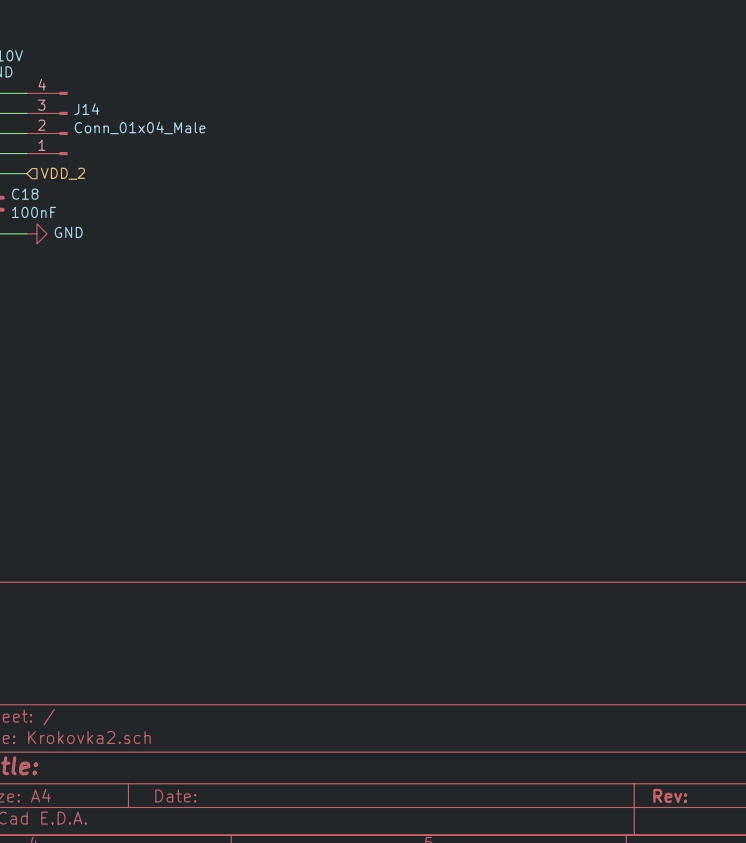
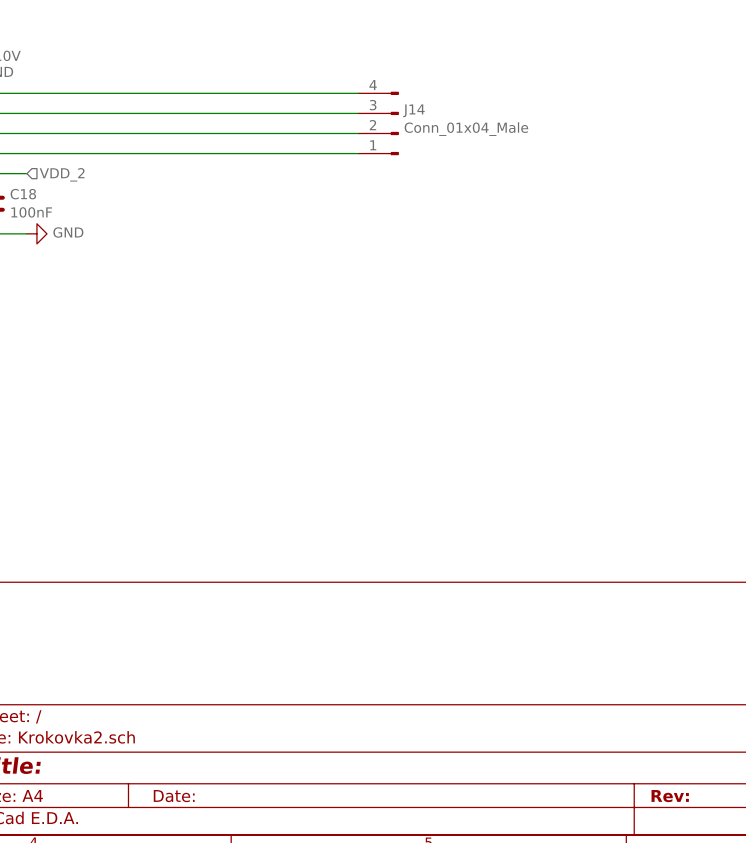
wire: none -> (26, 93) (358, 93)
wire: none -> (26, 113) (358, 113)
J14 position: (47, 123) -> (378, 123)
wire: none -> (26, 133) (358, 133)
wire: none -> (26, 153) (358, 153)

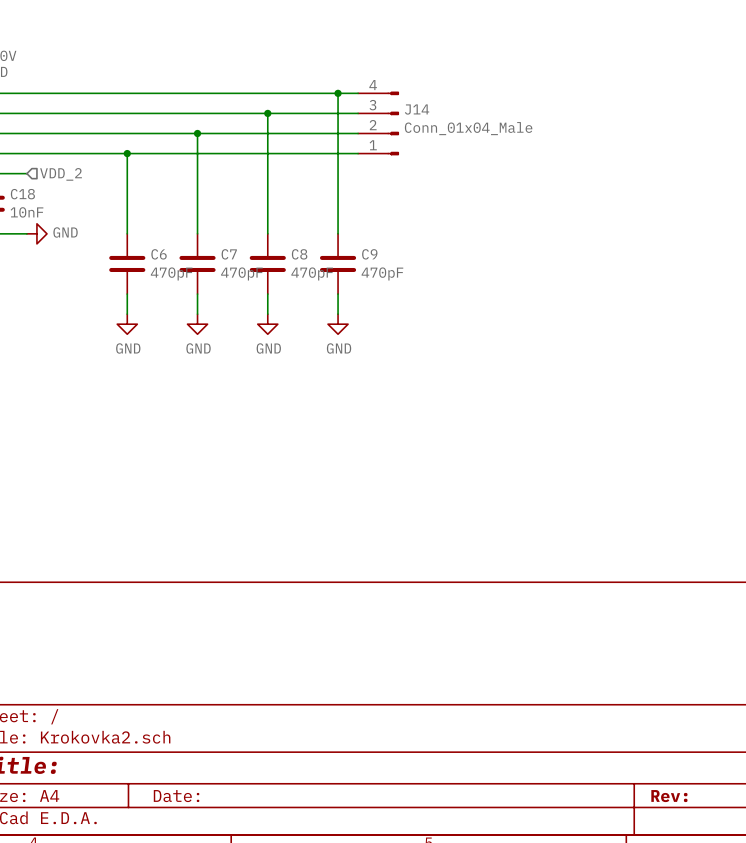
wire: none -> (338, 93) (338, 233)
junction: none -> (338, 93)
wire: none -> (267, 113) (267, 233)
junction: none -> (267, 113)
wire: none -> (197, 133) (197, 233)
junction: none -> (197, 133)
wire: none -> (127, 153) (127, 233)
junction: none -> (127, 153)
C18 value: 100nF (31, 212) -> 10nF (26, 212)
C6: none -> 470pF (127, 263)
C7: none -> 470pF (197, 263)
C8: none -> 470pF (267, 263)
C9: none -> 470pF (338, 263)
wire: none -> (127, 294) (127, 314)
wire: none -> (197, 294) (197, 314)
wire: none -> (267, 294) (267, 314)
wire: none -> (338, 294) (338, 314)
power symbol: none -> GND (127, 324)
power symbol: none -> GND (197, 324)
power symbol: none -> GND (267, 324)
power symbol: none -> GND (338, 324)

